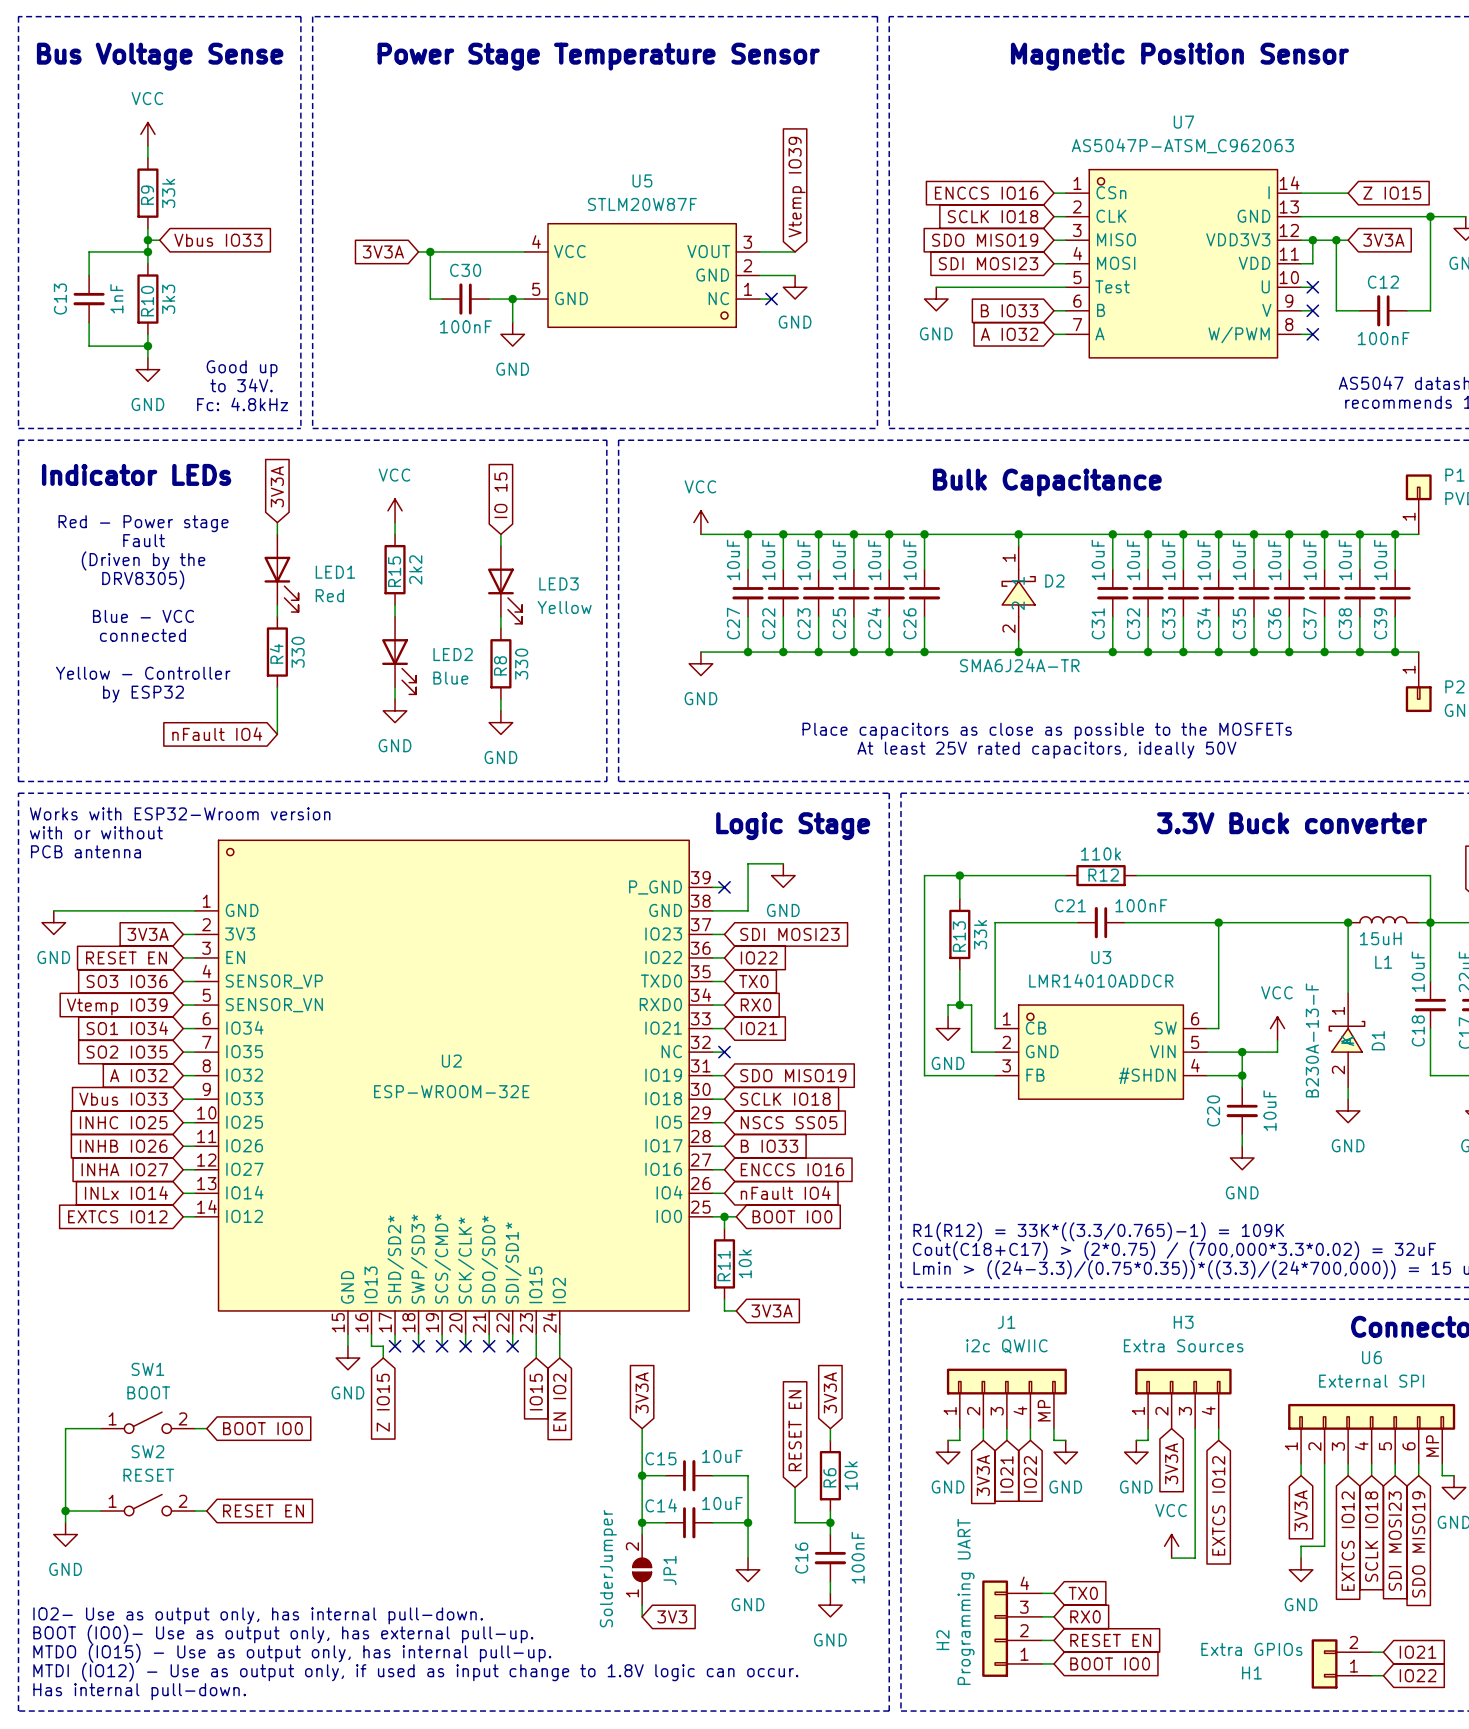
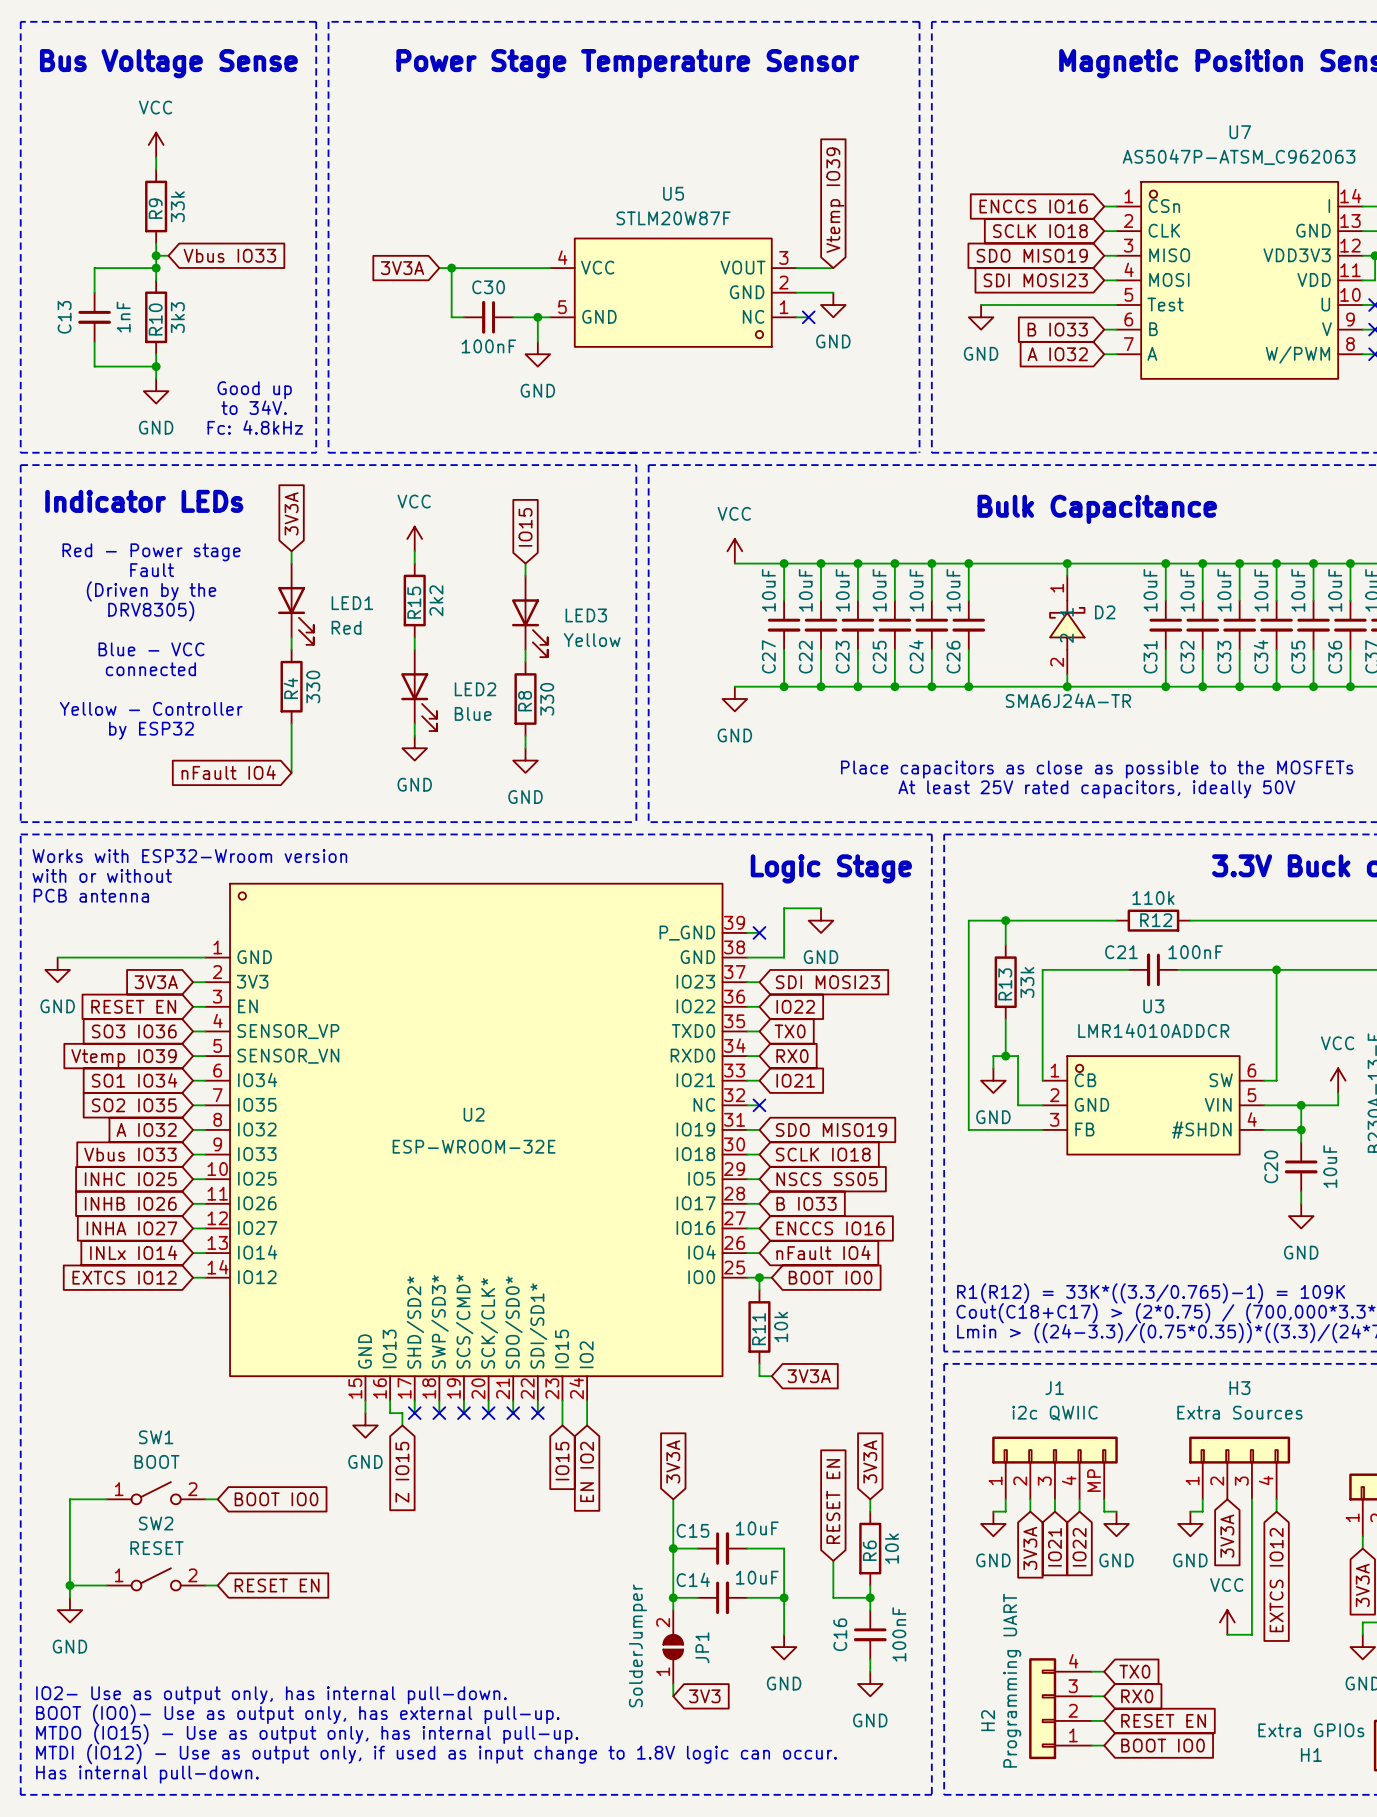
global label: IO 15 (500, 495) -> IO15 (525, 527)

